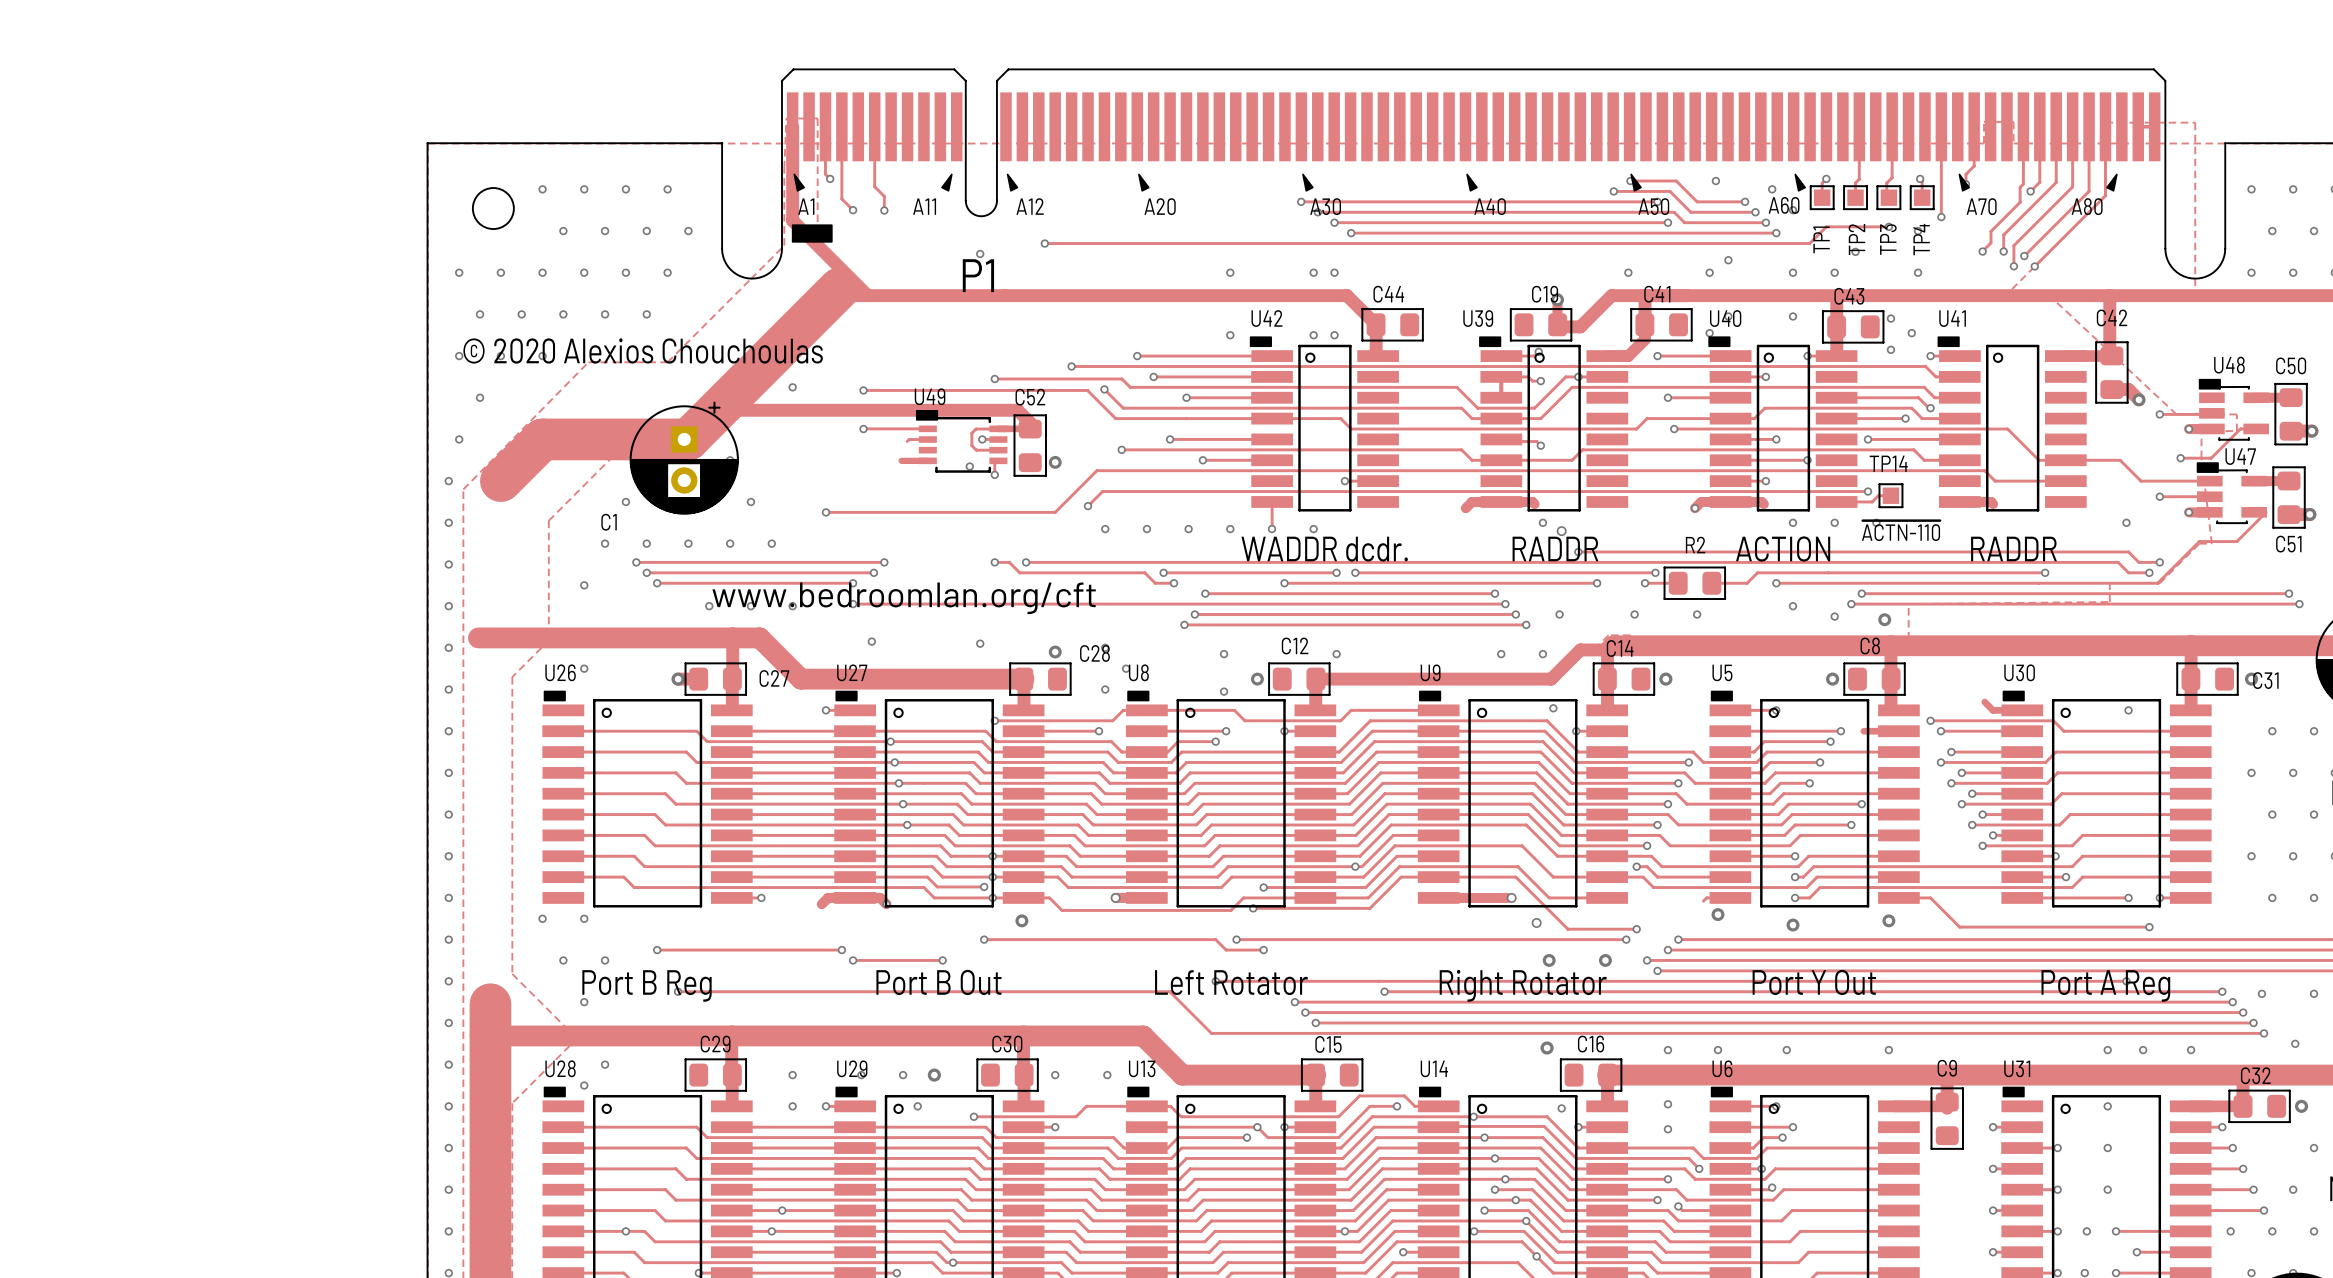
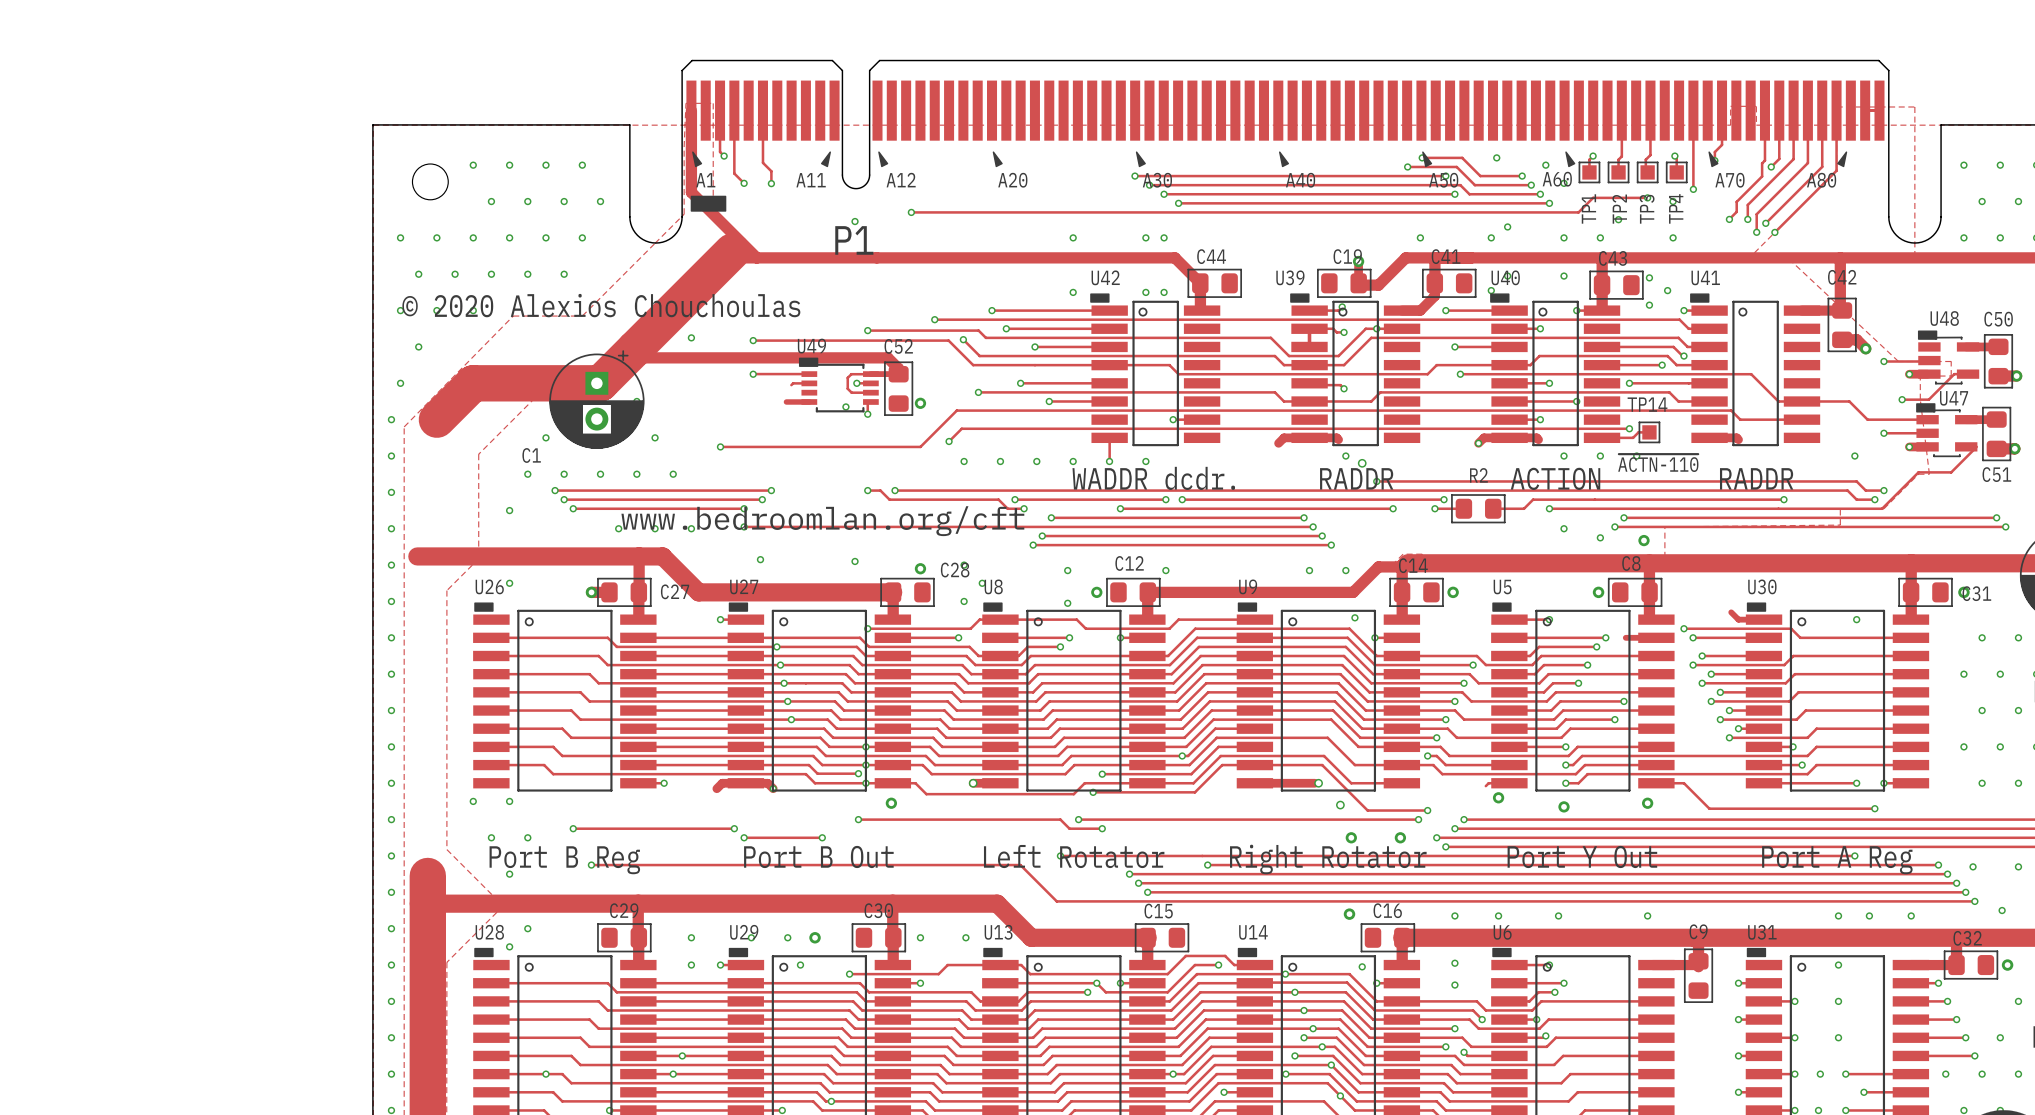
via: (1559, 614) -> none
via: (1634, 614) -> none
via: (1697, 614) -> none

